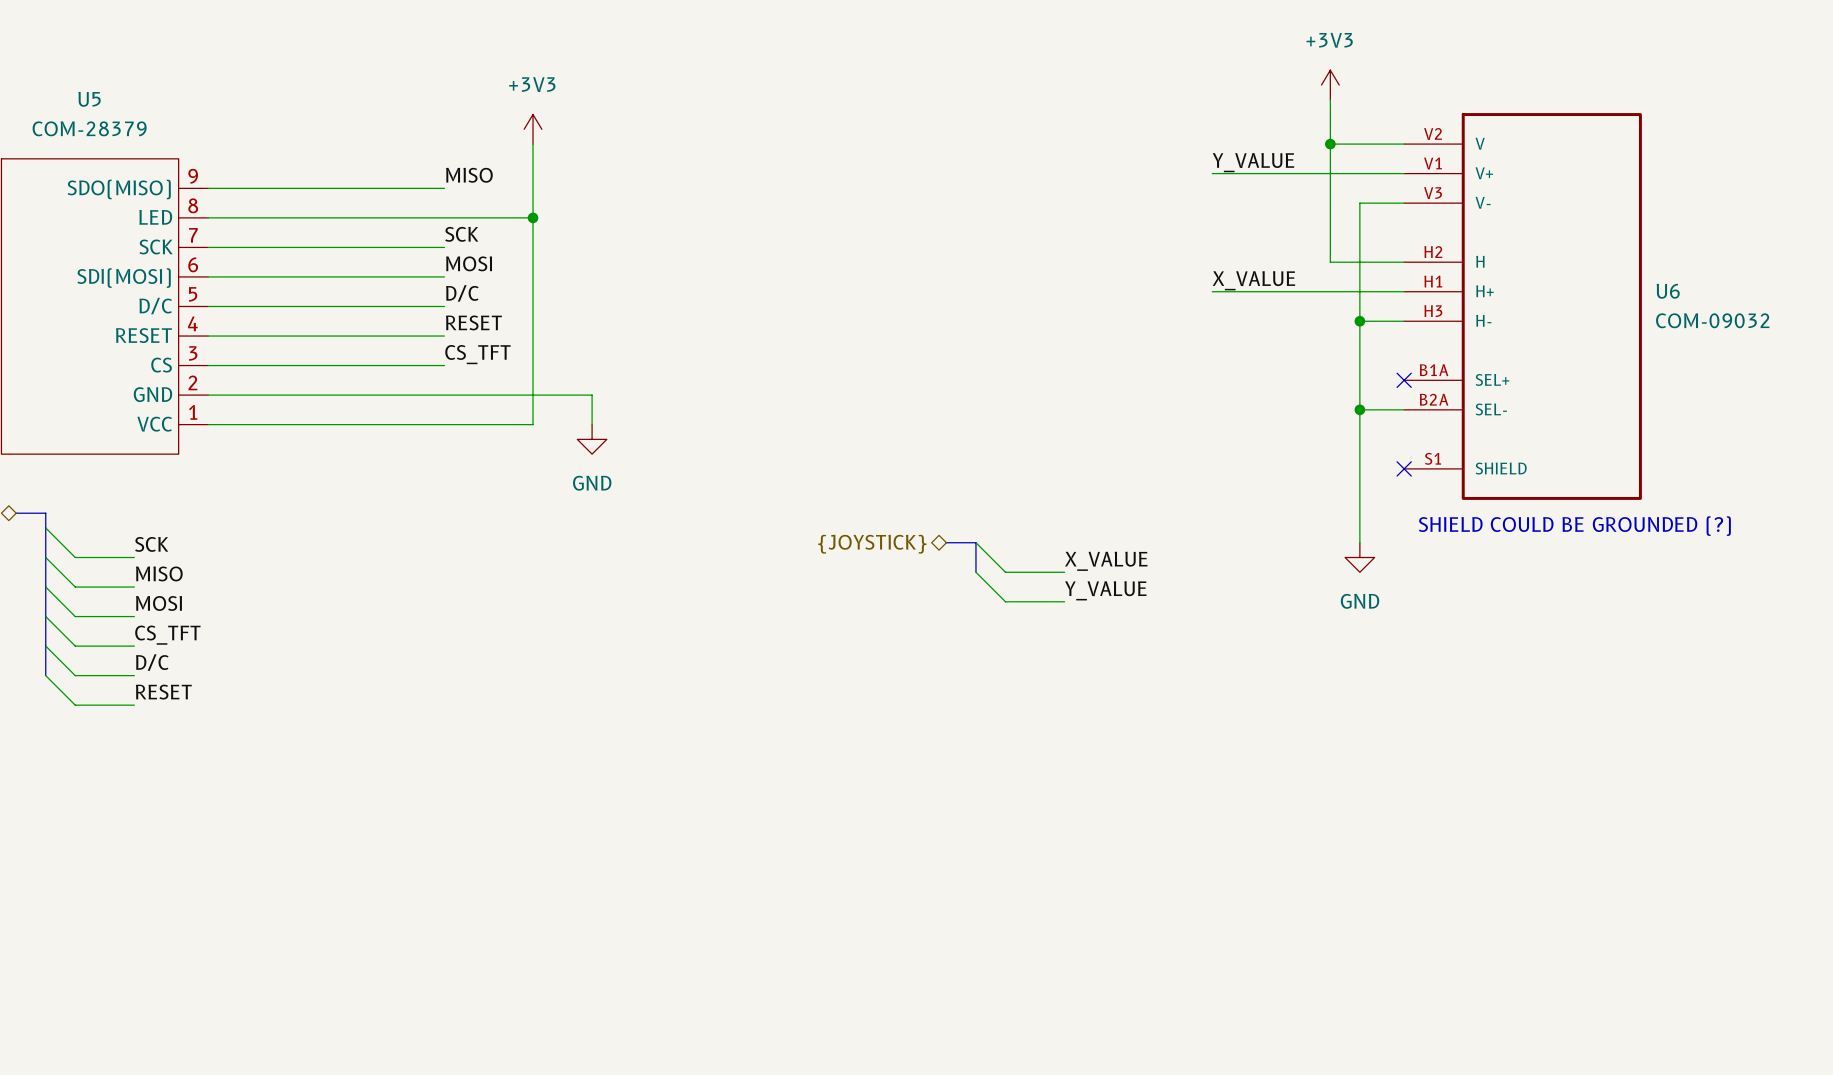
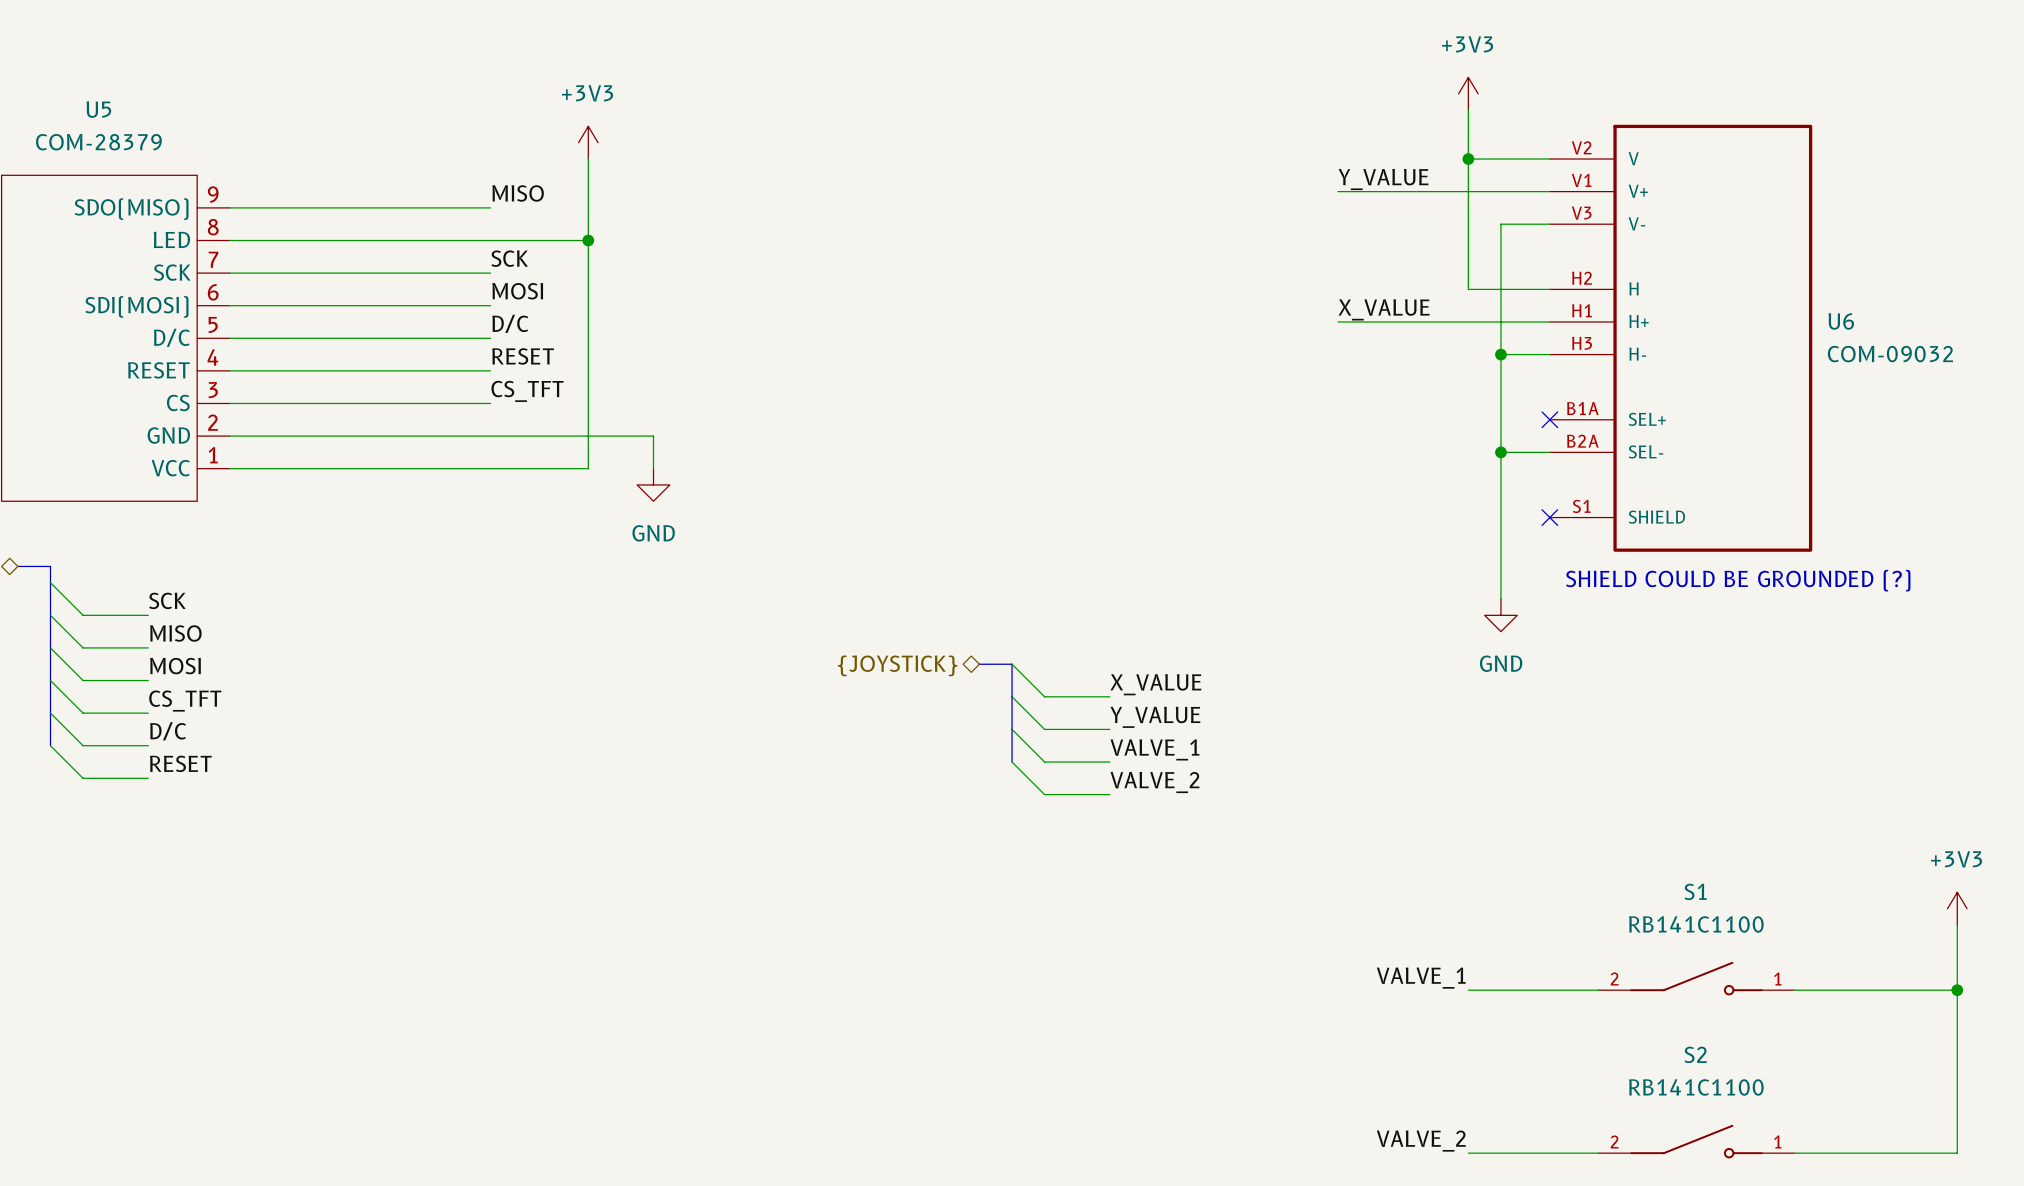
bus: (946, 542) (975, 542) (975, 572) -> none
wire: (975, 542) (1005, 572) (1064, 572) -> (1012, 664) (1044, 696) (1109, 696)
hierarchical label position: {JOYSTICK} (872, 544) -> {JOYSTICK} (897, 665)
label position: X_VALUE (1106, 561) -> X_VALUE (1155, 684)
wire: (975, 572) (1005, 601) (1064, 601) -> (1012, 696) (1044, 729) (1109, 729)
label position: Y_VALUE (1105, 590) -> Y_VALUE (1155, 717)
bus: none -> (979, 664) (1012, 664) (1012, 762)
wire: none -> (1012, 729) (1044, 762) (1109, 762)
label: none -> VALVE_1 (1154, 749)
wire: none -> (1012, 762) (1044, 794) (1109, 794)
label: none -> VALVE_2 (1154, 782)
power symbol: none -> +3V3 (1957, 908)
wire: none -> (1957, 924) (1957, 1153) (1794, 1153)
label: none -> VALVE_1 (1421, 978)
S1: none -> RB141C1100 (1696, 978)
wire: none -> (1468, 990) (1598, 990)
wire: none -> (1794, 990) (1957, 990)
junction: none -> (1957, 990)
label: none -> VALVE_2 (1421, 1141)
S2: none -> RB141C1100 (1696, 1141)
wire: none -> (1468, 1153) (1598, 1153)

